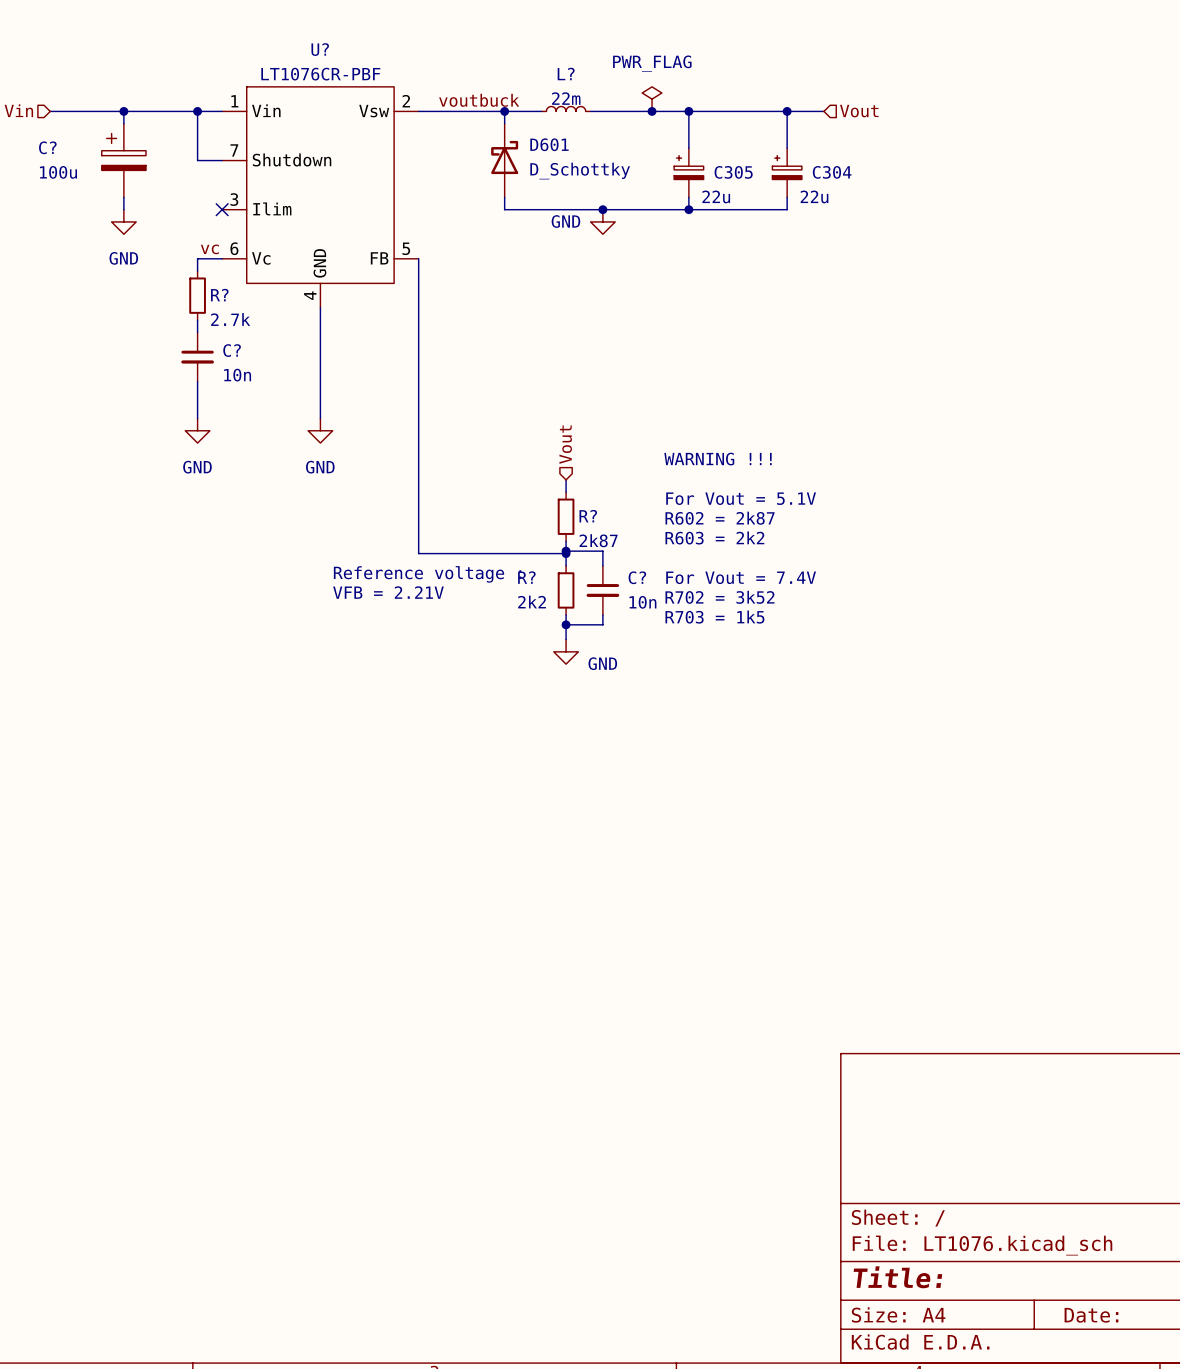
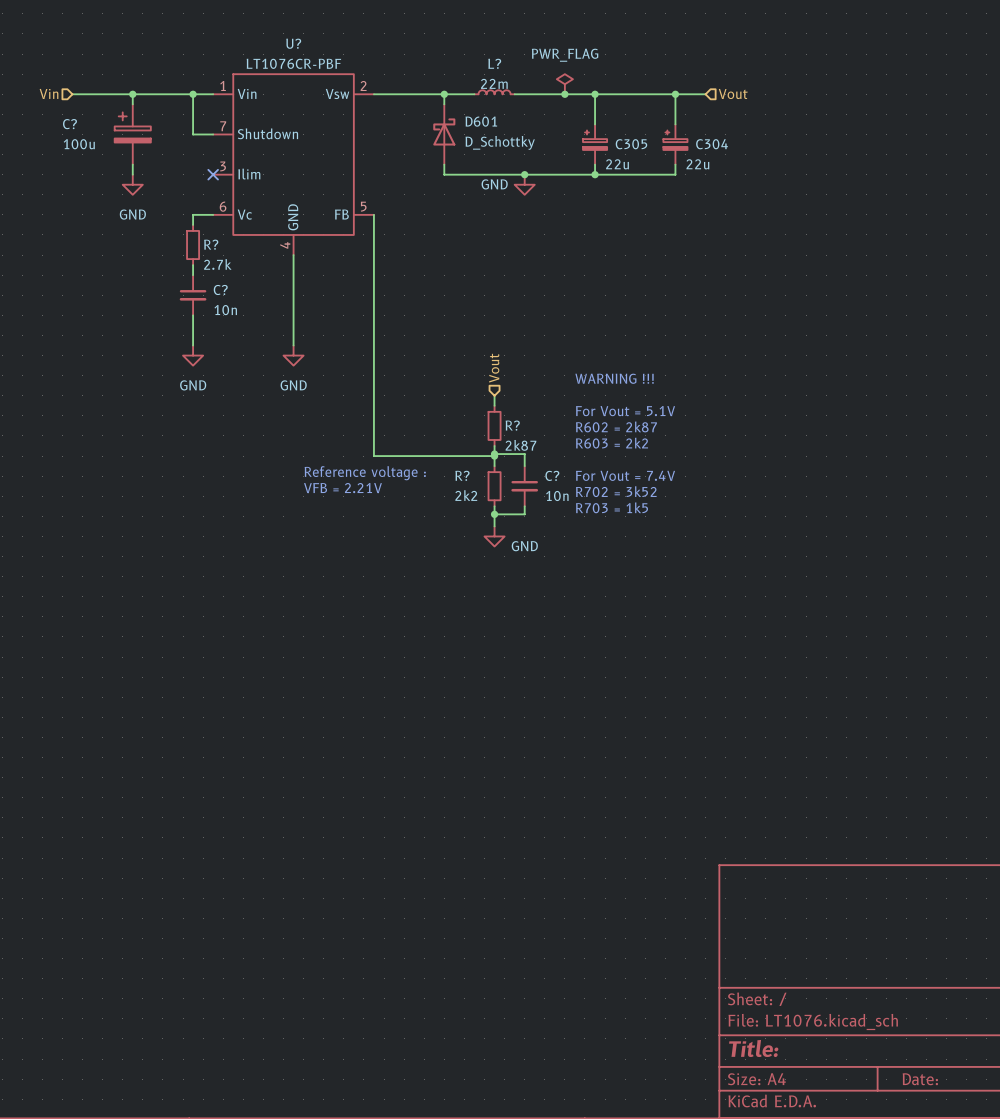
label: voutbuck (479, 100) -> none
label: vc (209, 249) -> none

